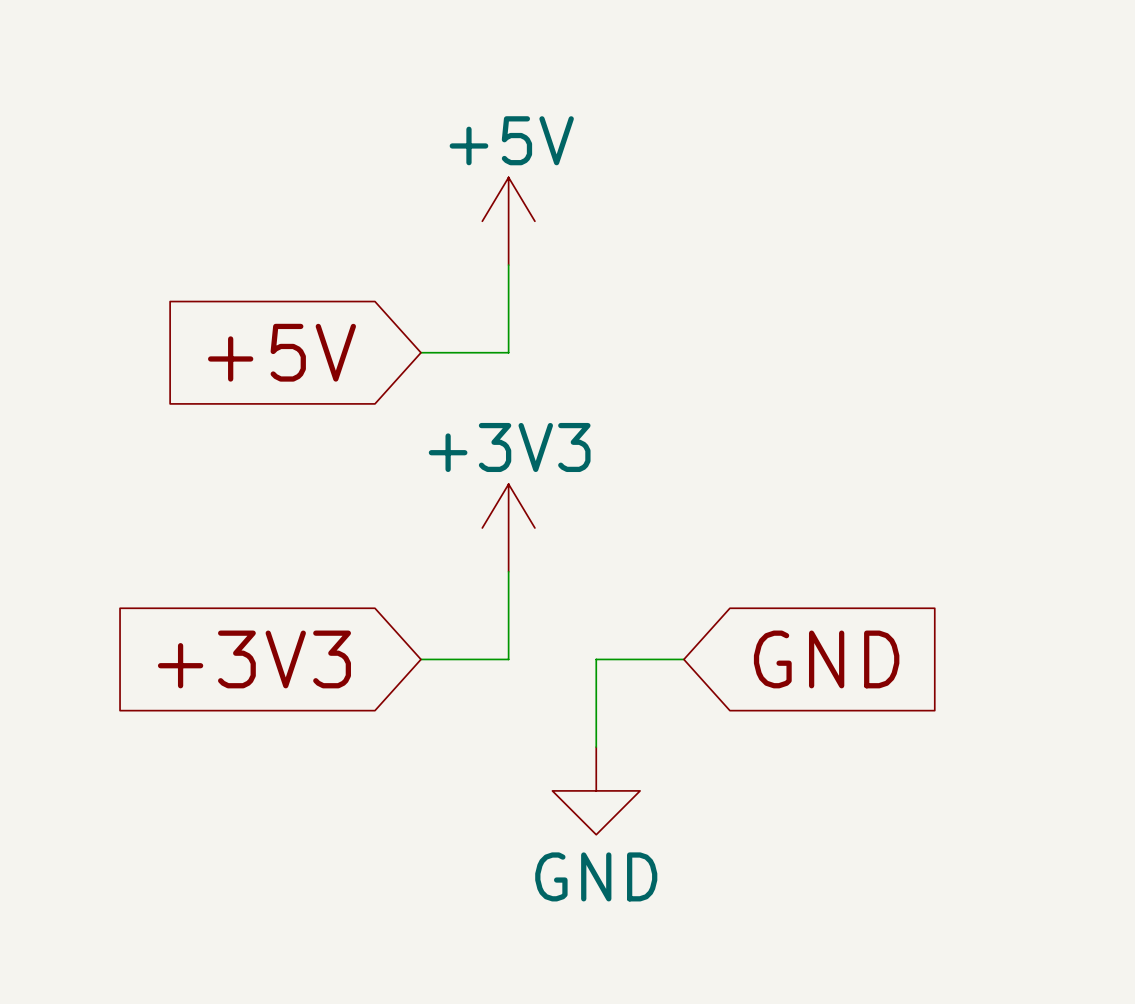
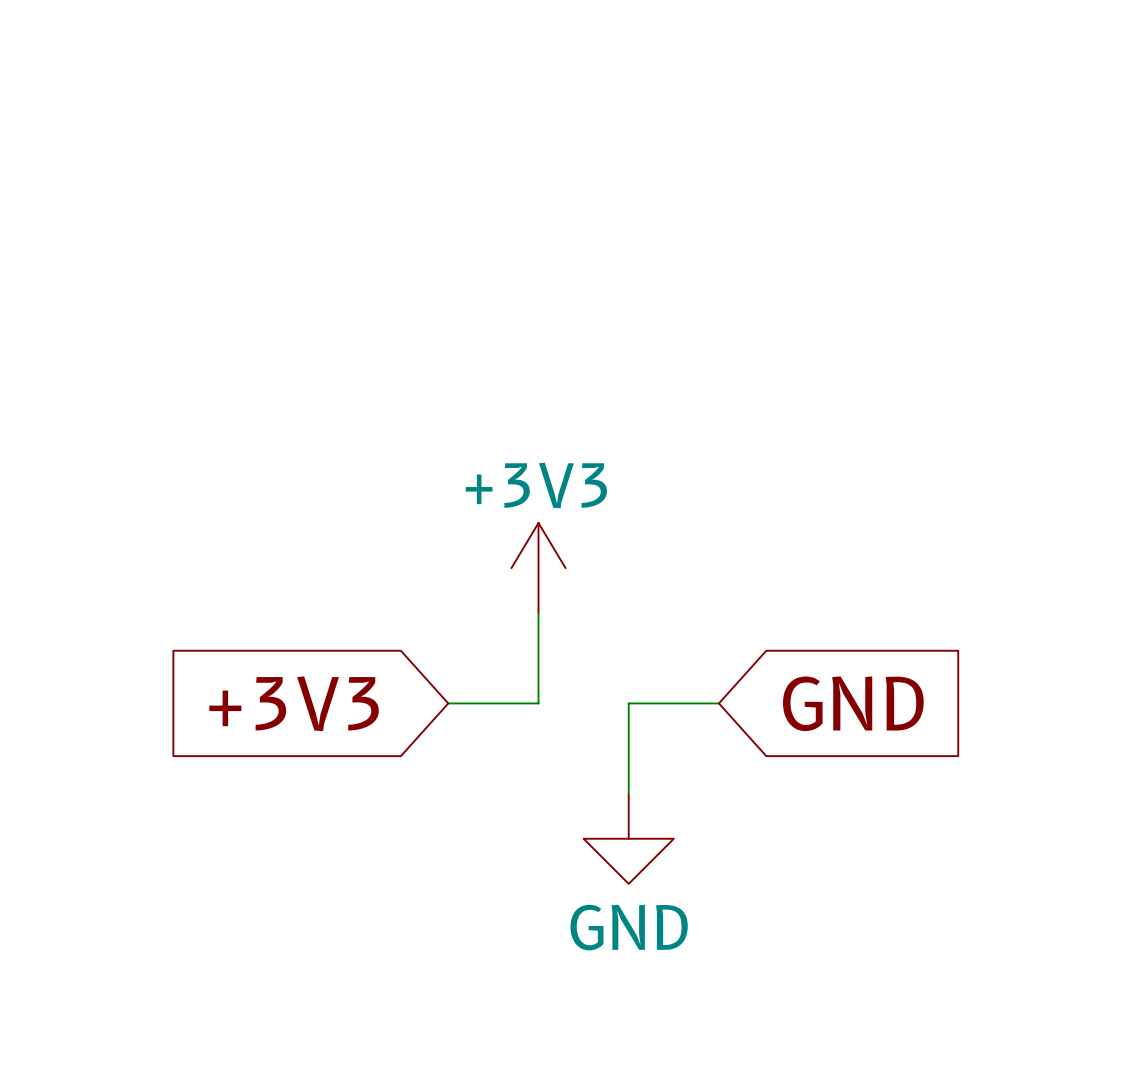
power symbol: +5V (508, 221) -> none
wire: (508, 265) (508, 352) (420, 352) -> none
global label: +5V (282, 352) -> none

